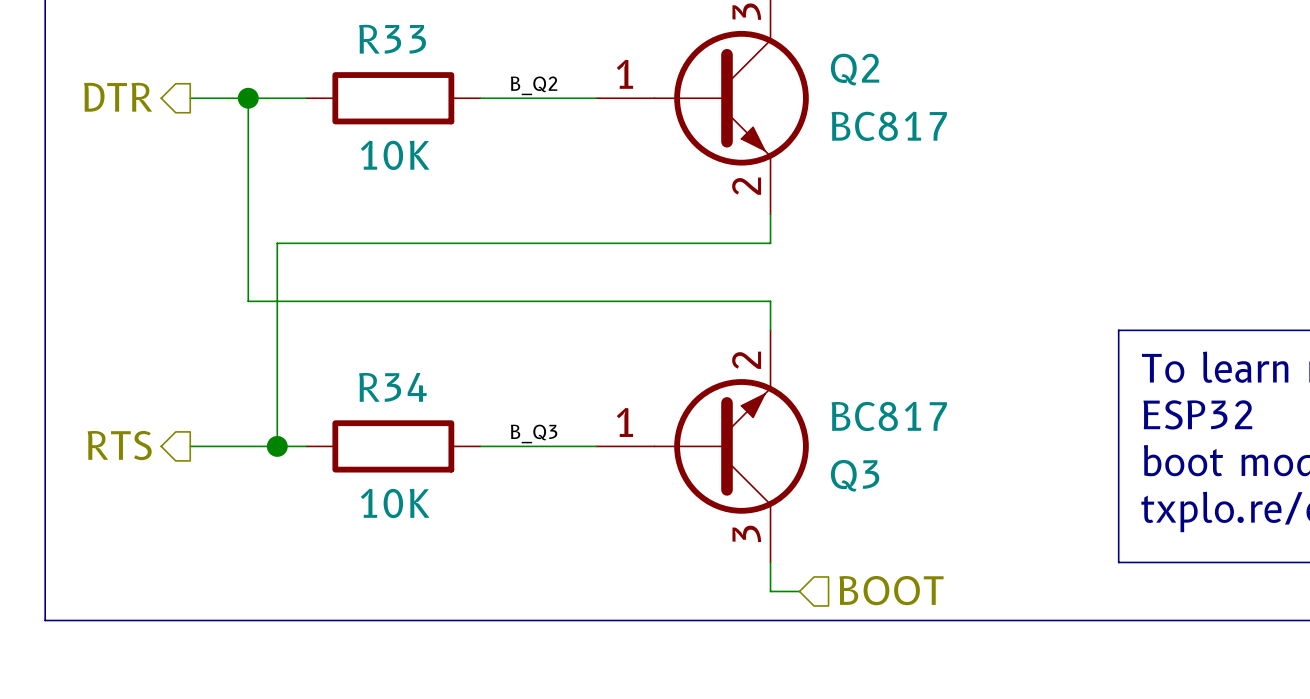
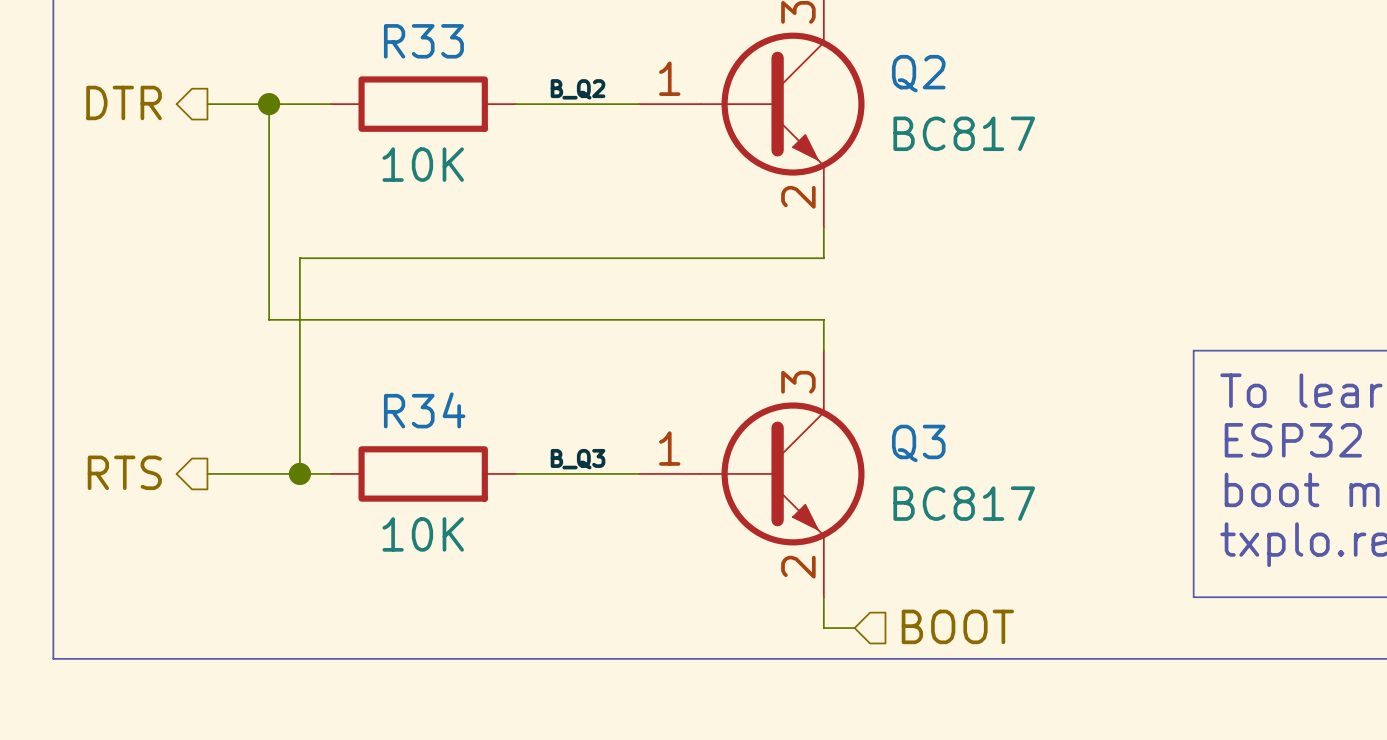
Q3 flip: as is (731, 446) -> up-down (782, 473)

